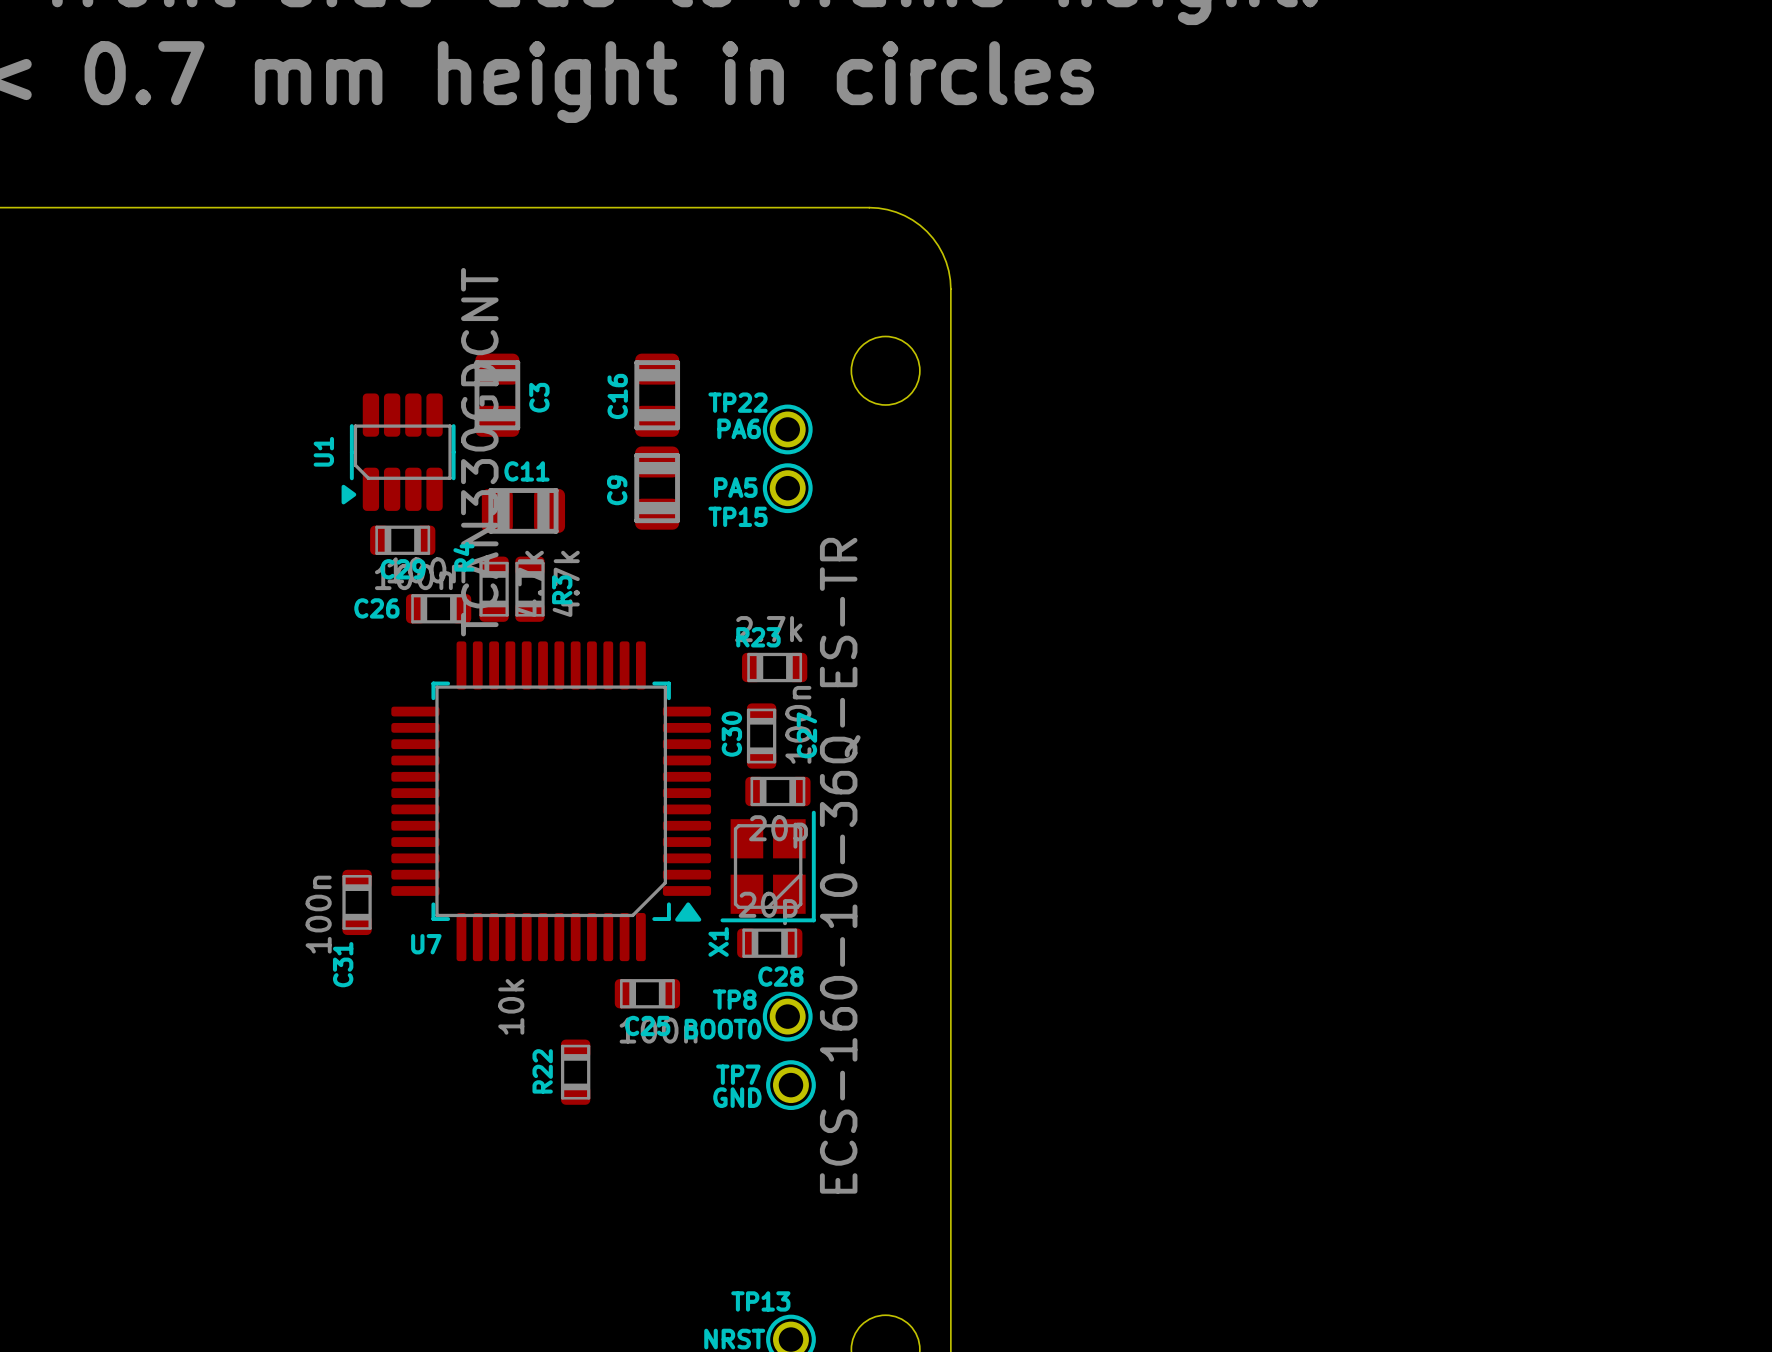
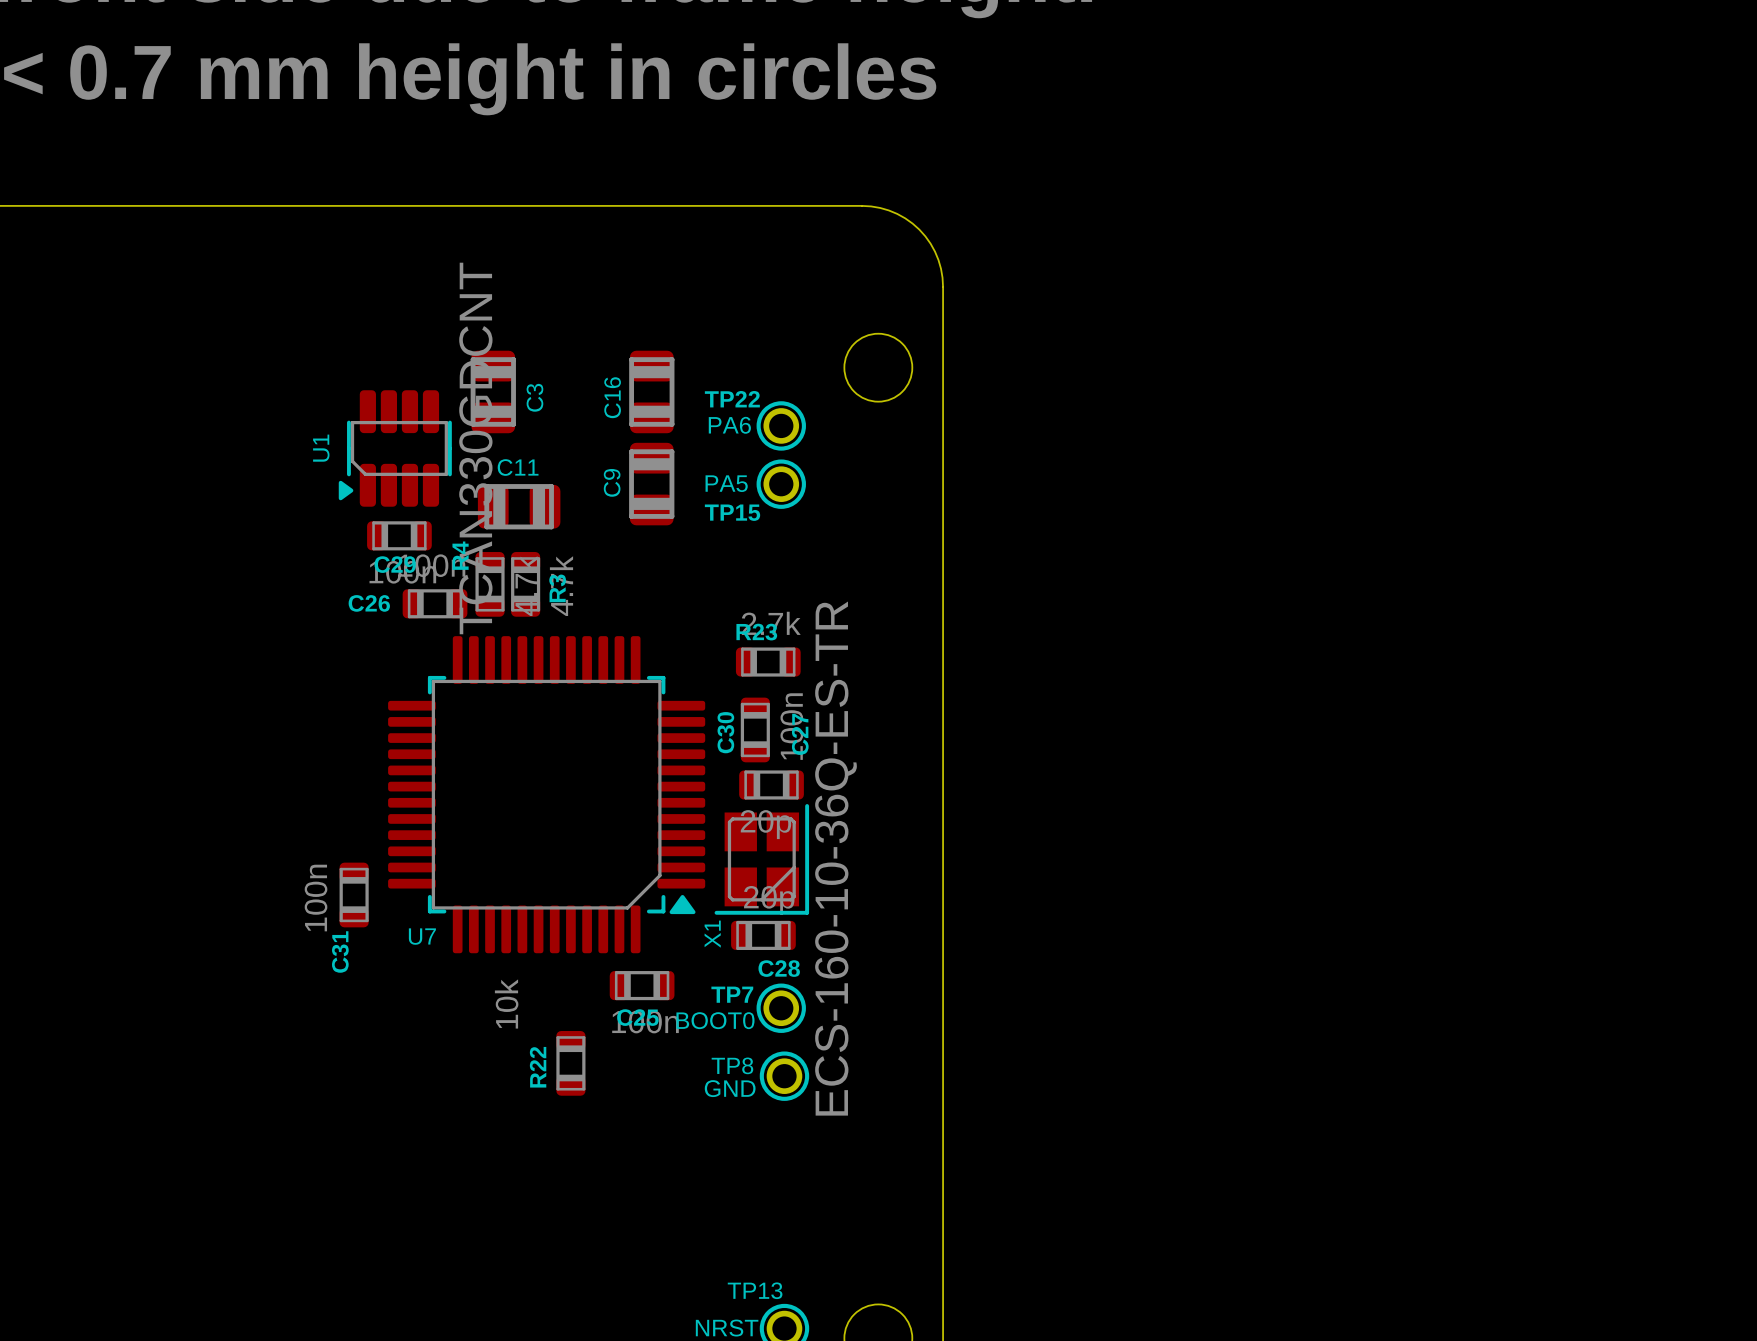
TP8 name position: TP8 (734, 999) -> TP8 (732, 1065)
TP7 name position: TP7 (738, 1074) -> TP7 (732, 994)

